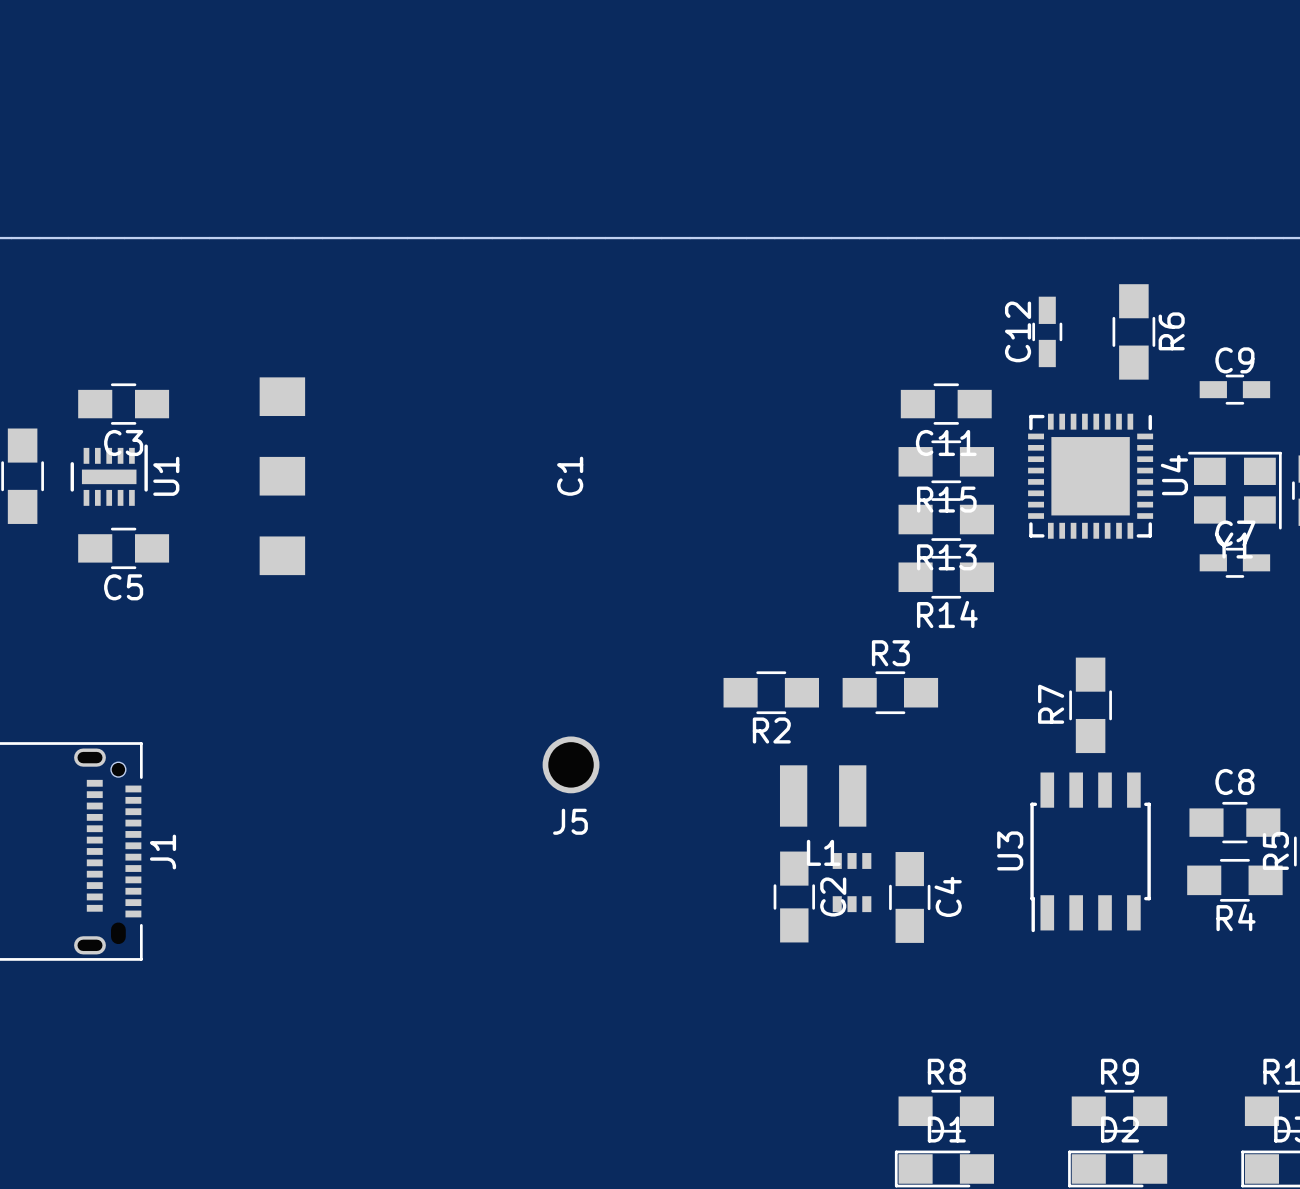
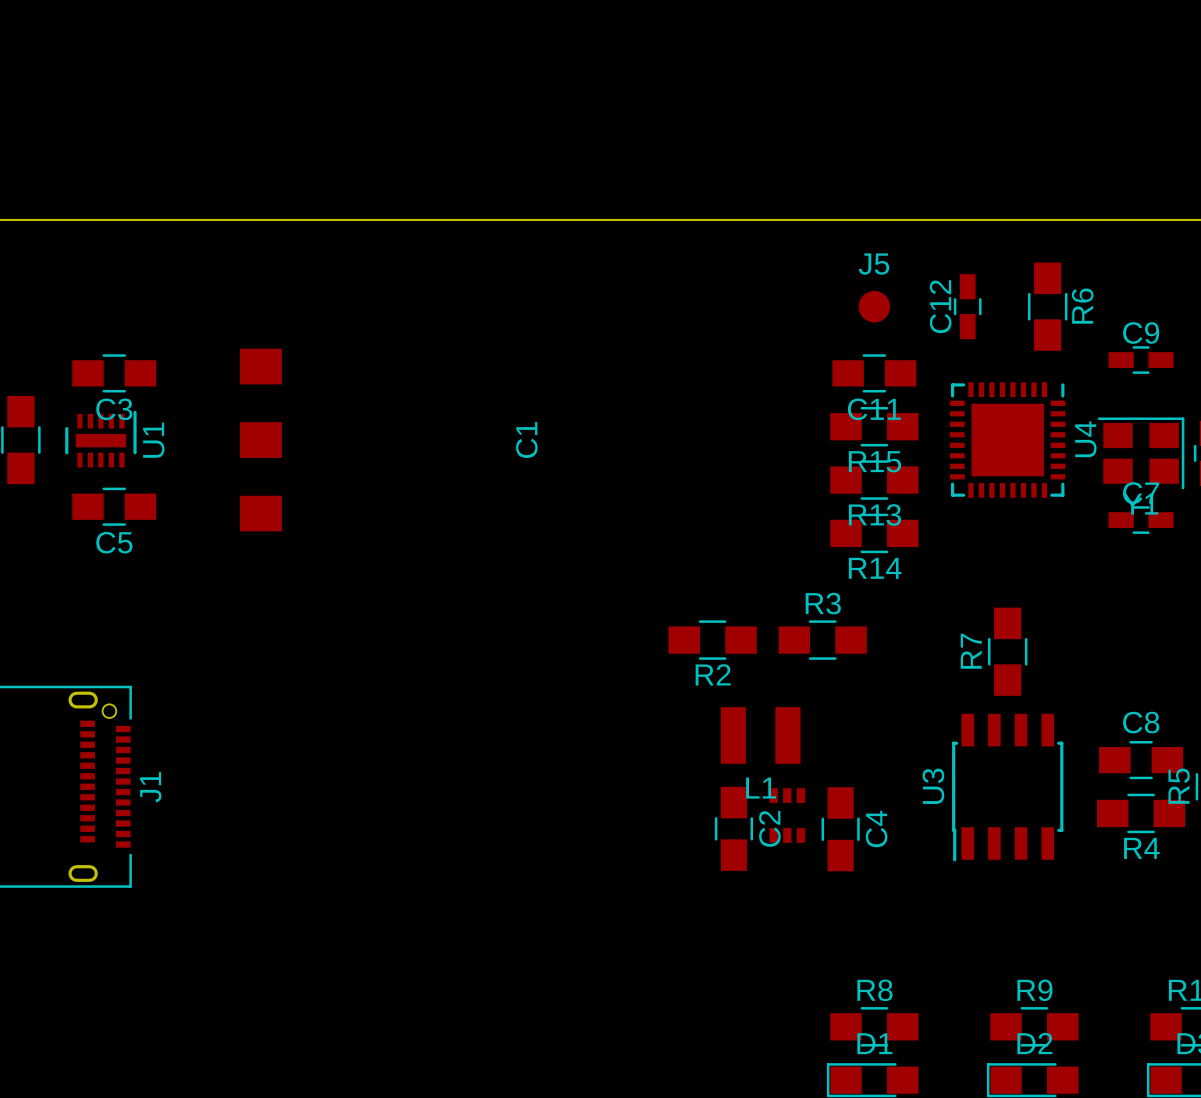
J5 footprint: [542, 736, 600, 794] -> [858, 290, 891, 323]
J5 name position: J5 (570, 821) -> J5 (873, 264)

